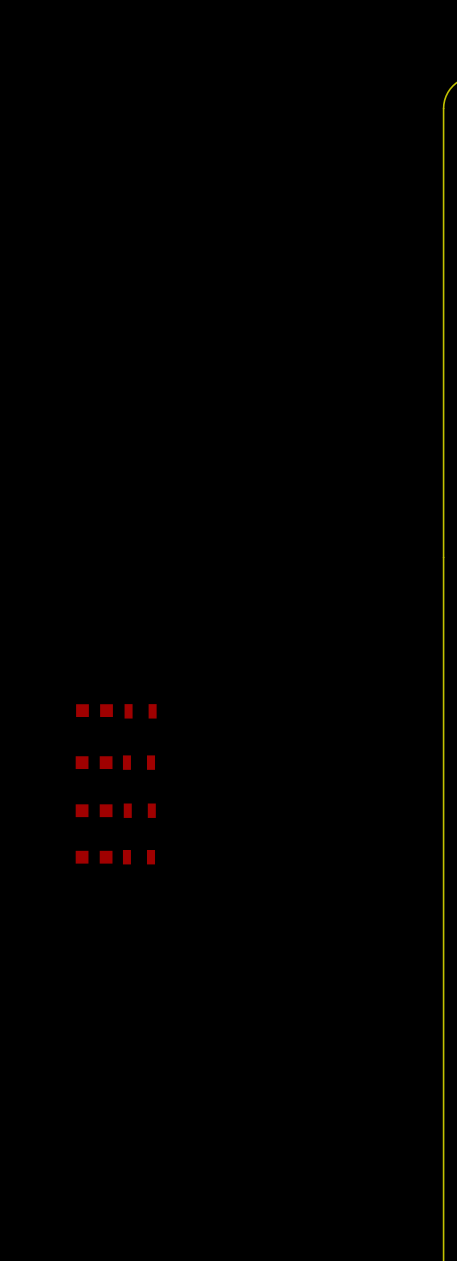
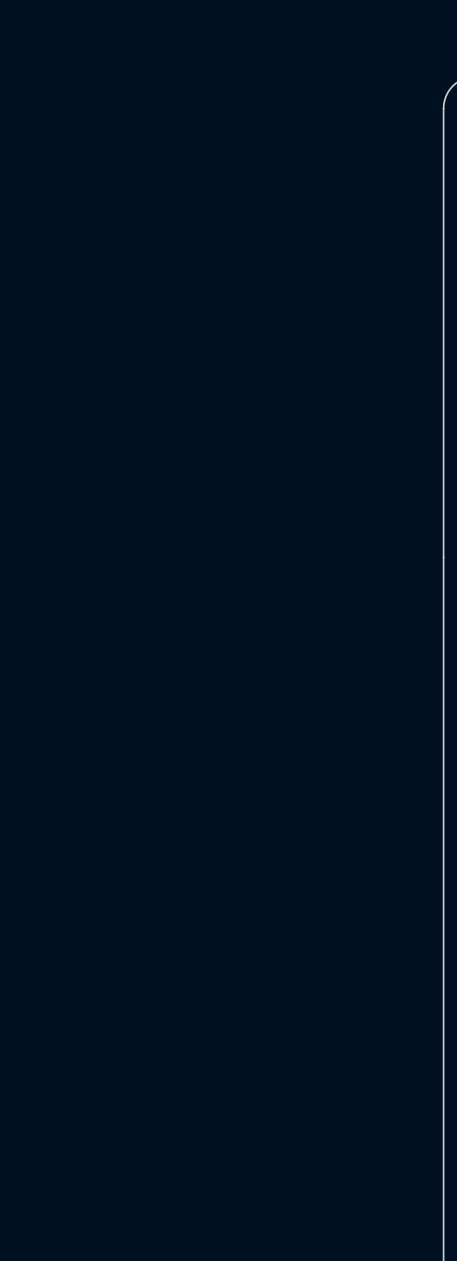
part: (94, 710) -> none
part: (140, 711) -> none
part: (94, 762) -> none
part: (138, 762) -> none
part: (94, 810) -> none
part: (139, 810) -> none
part: (94, 857) -> none
part: (138, 857) -> none

